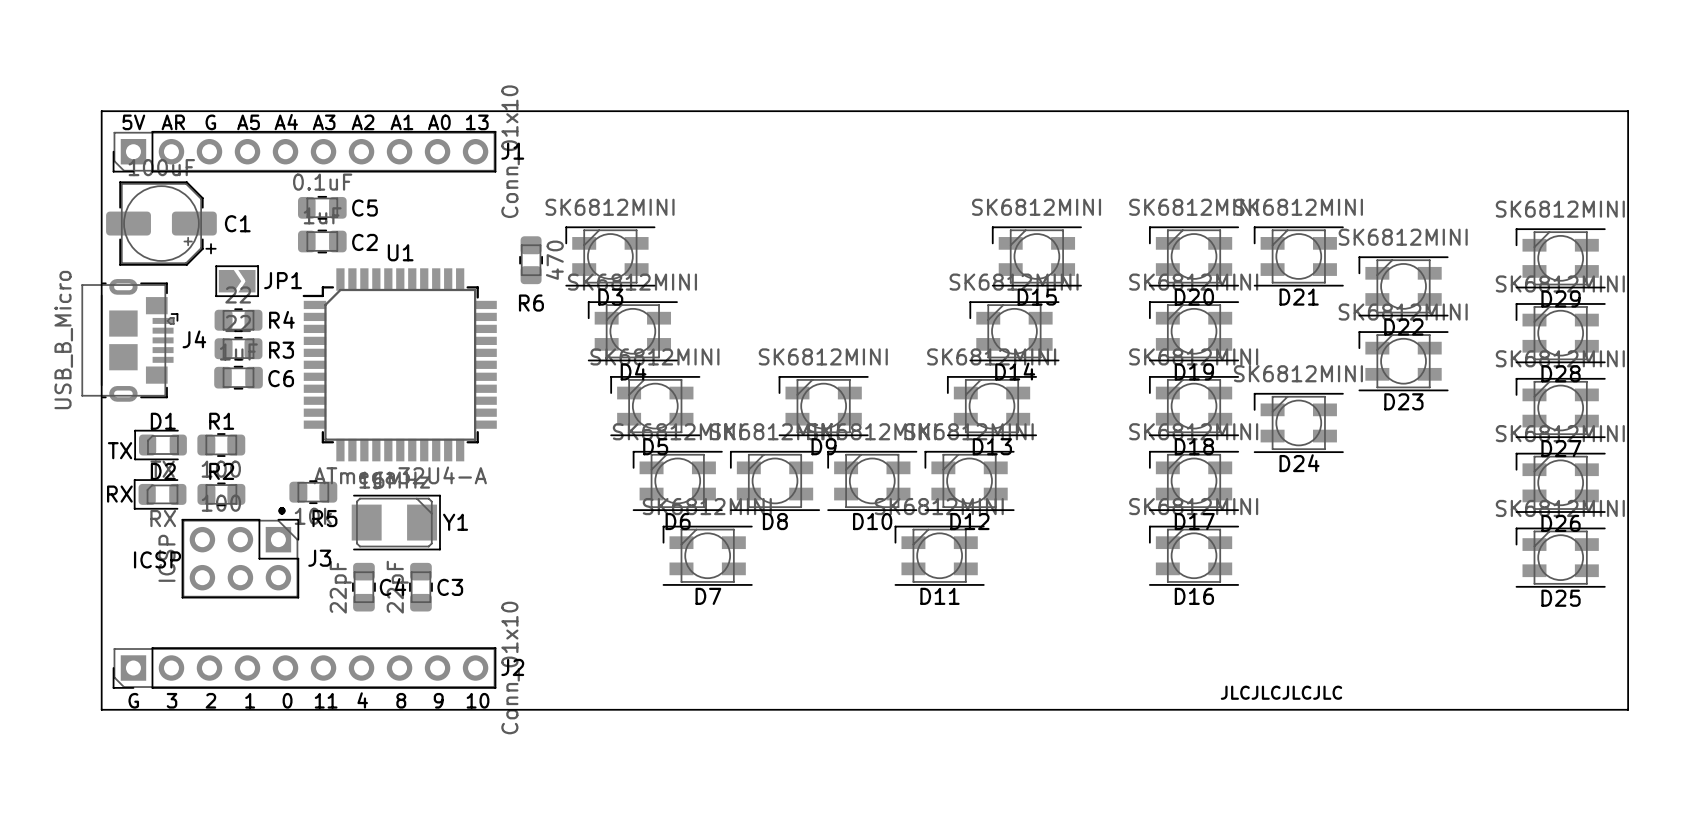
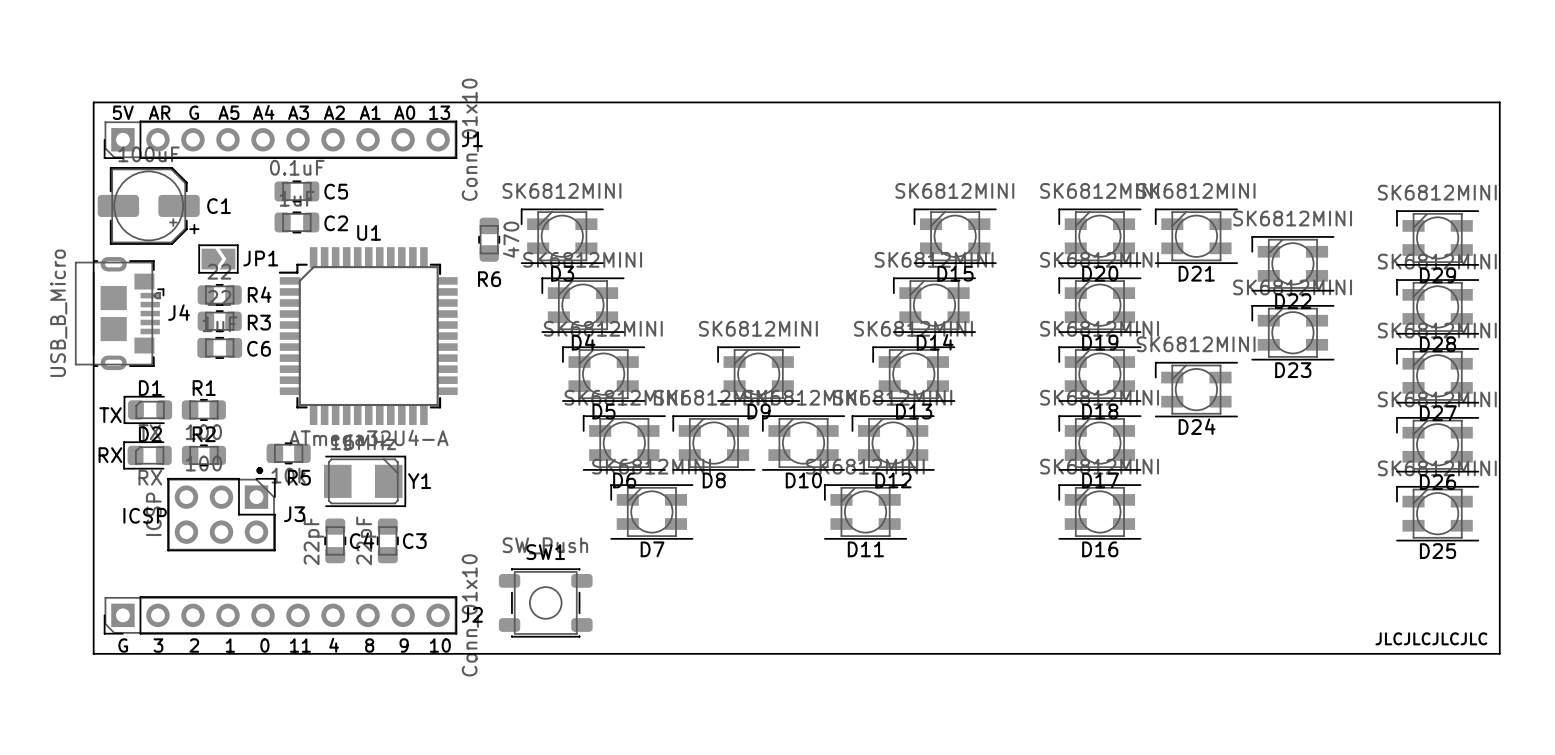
SW1: none -> SW_Push (545, 602)
text position: JLCJLCJLCJLC (1281, 692) -> JLCJLCJLCJLC (1431, 638)

